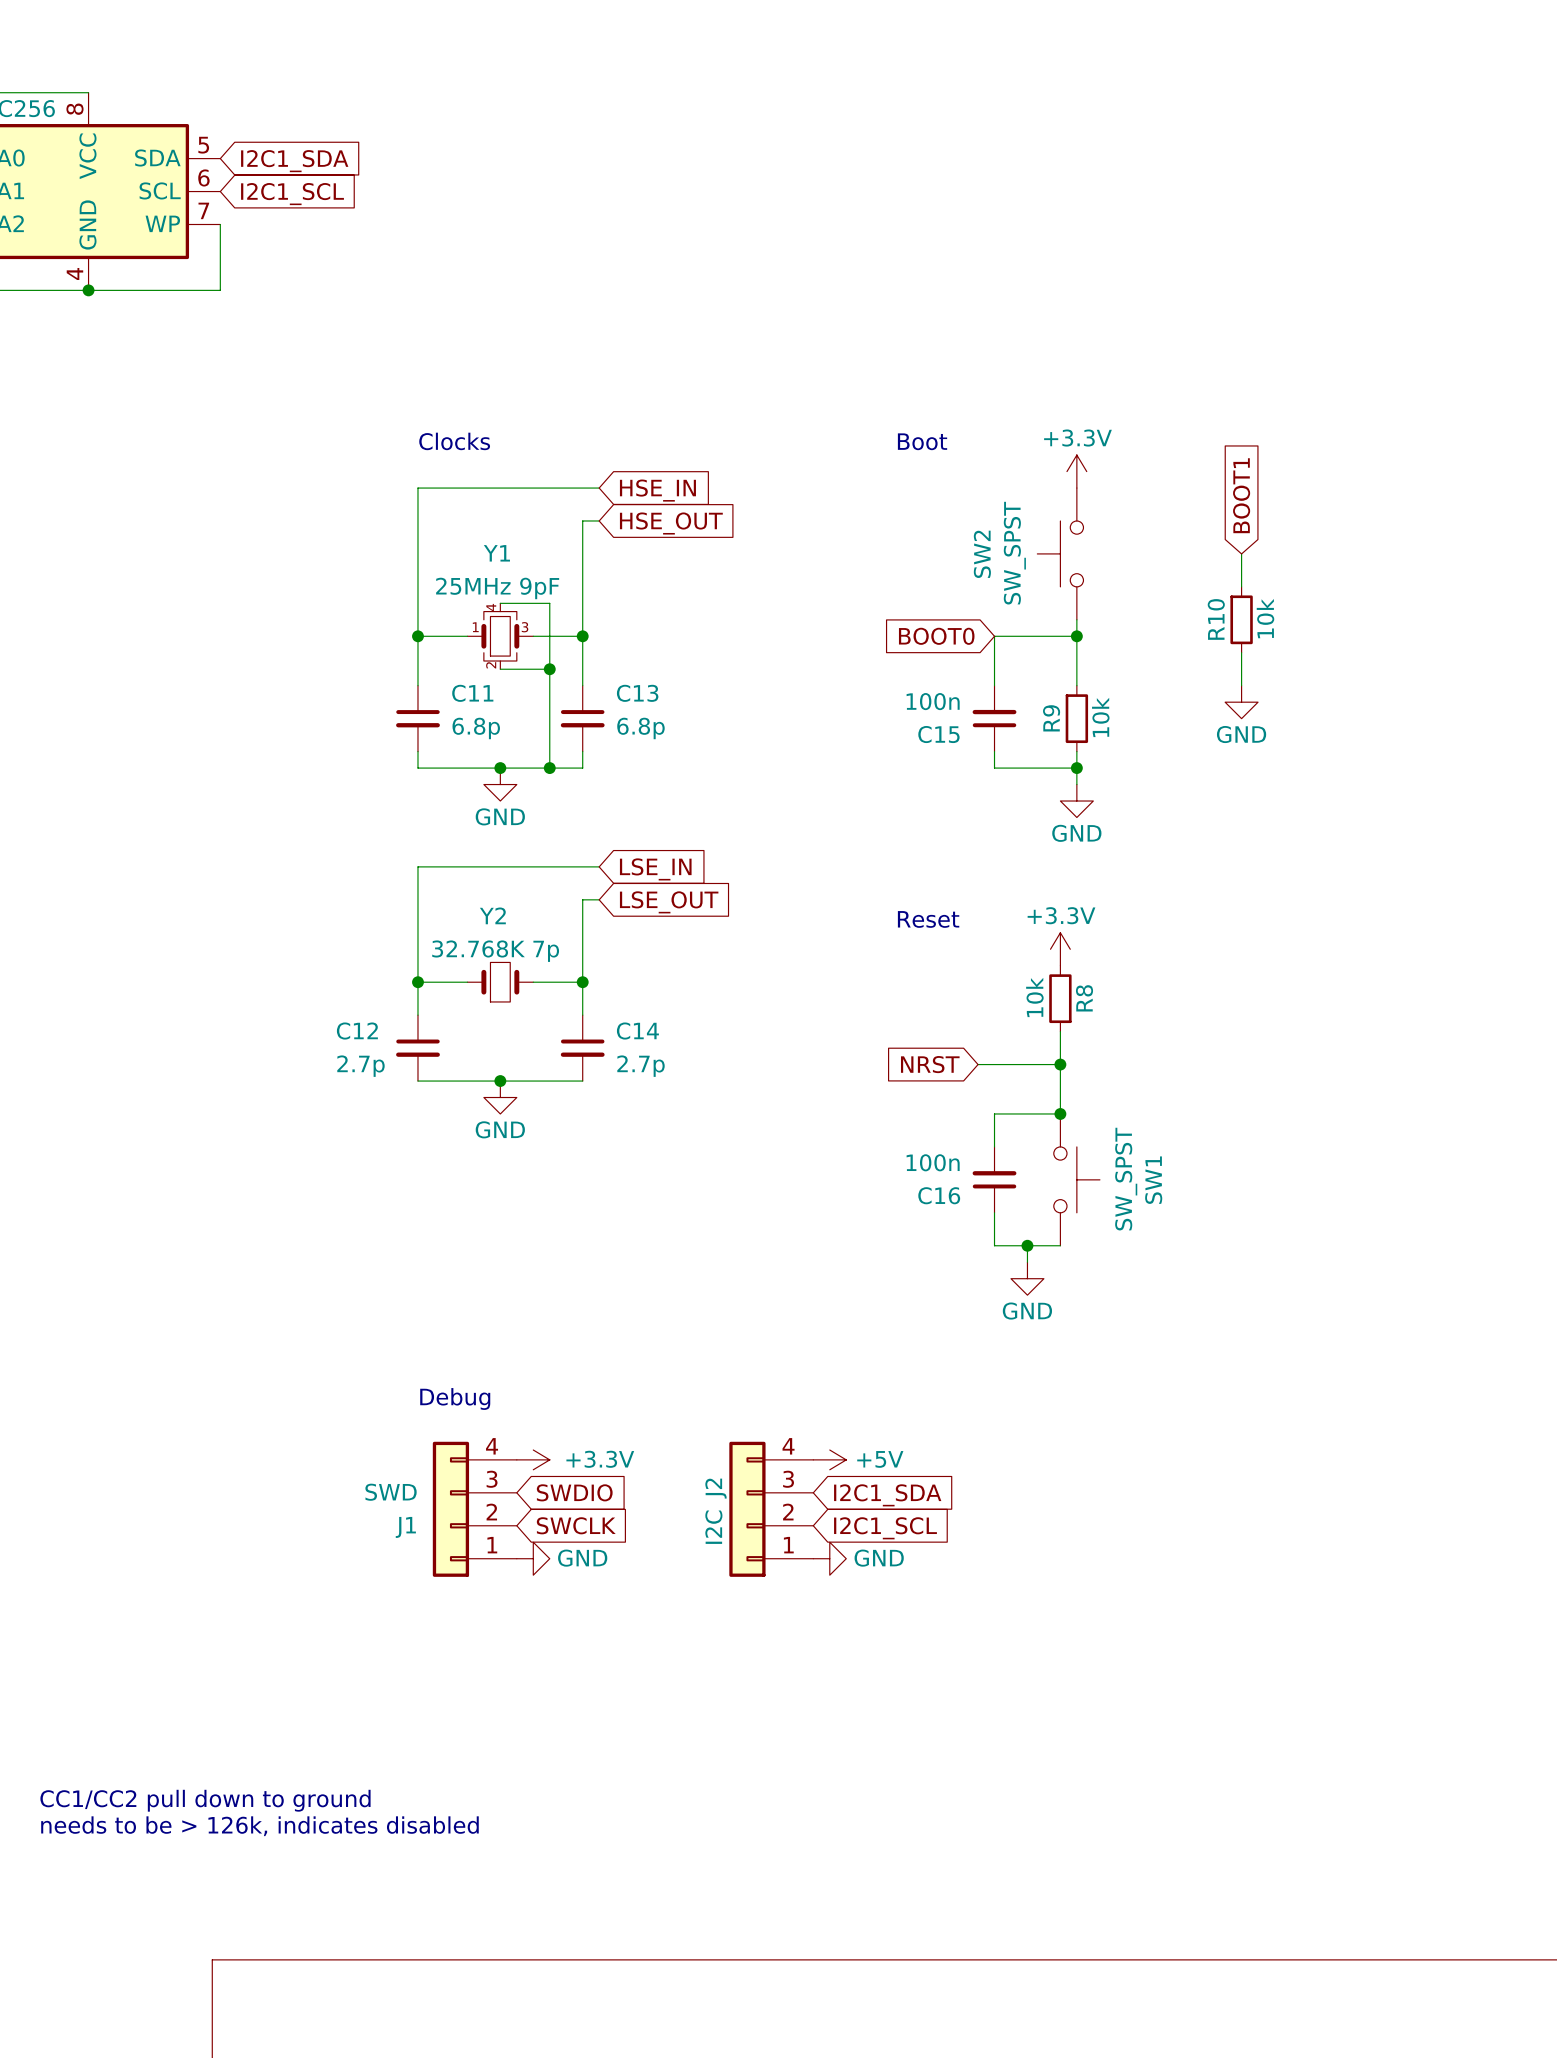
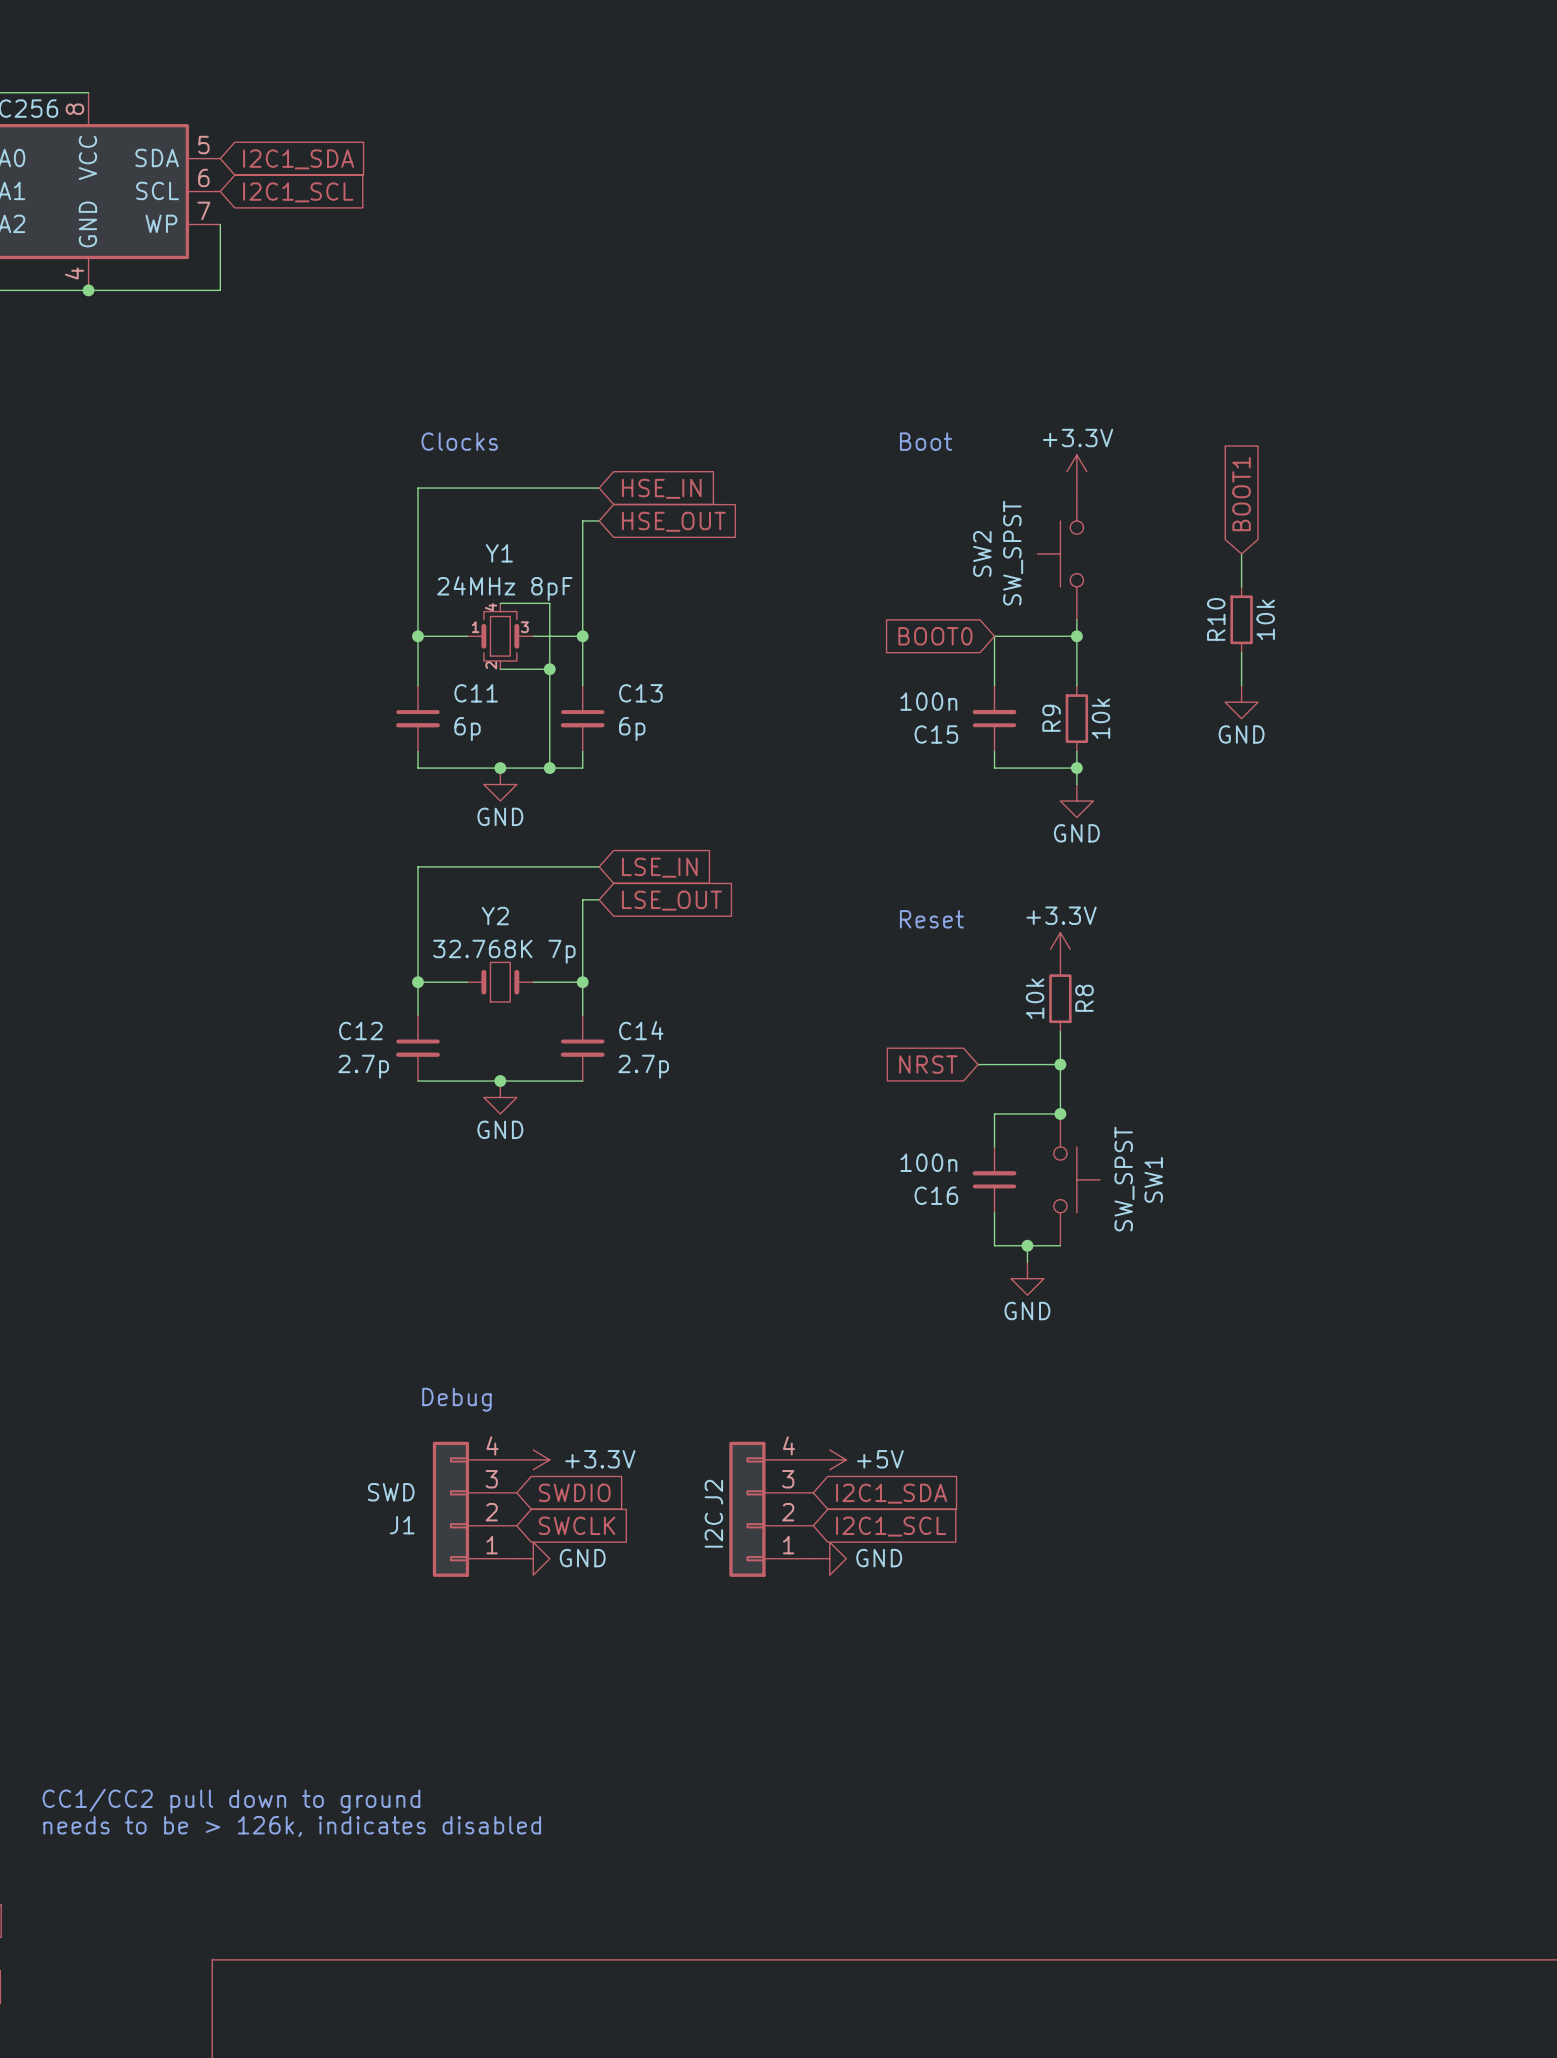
Y1 value: 25MHz 9pF (497, 588) -> 24MHz 8pF (504, 588)
C11 value: 6.8p (476, 728) -> 6p (467, 729)
C13 value: 6.8p (640, 728) -> 6p (632, 729)

